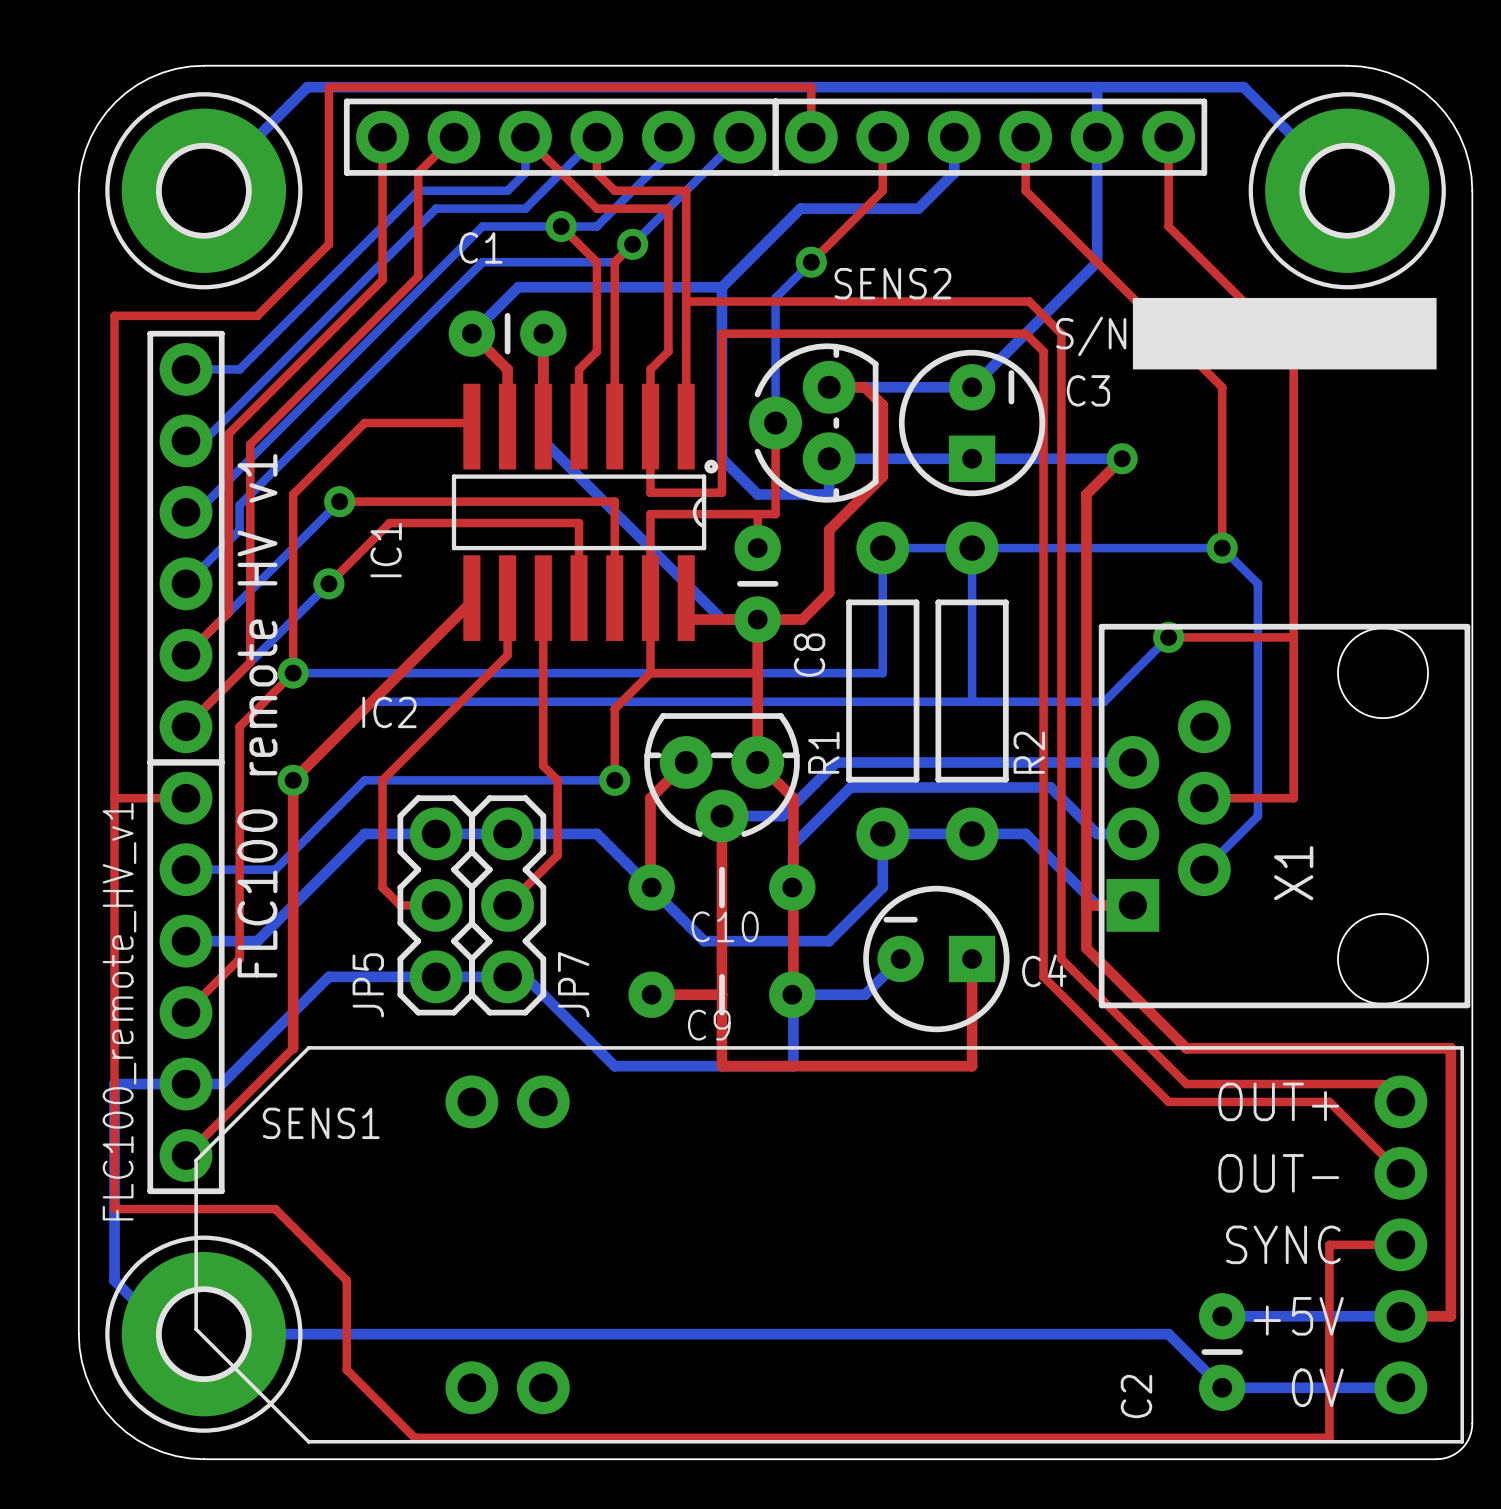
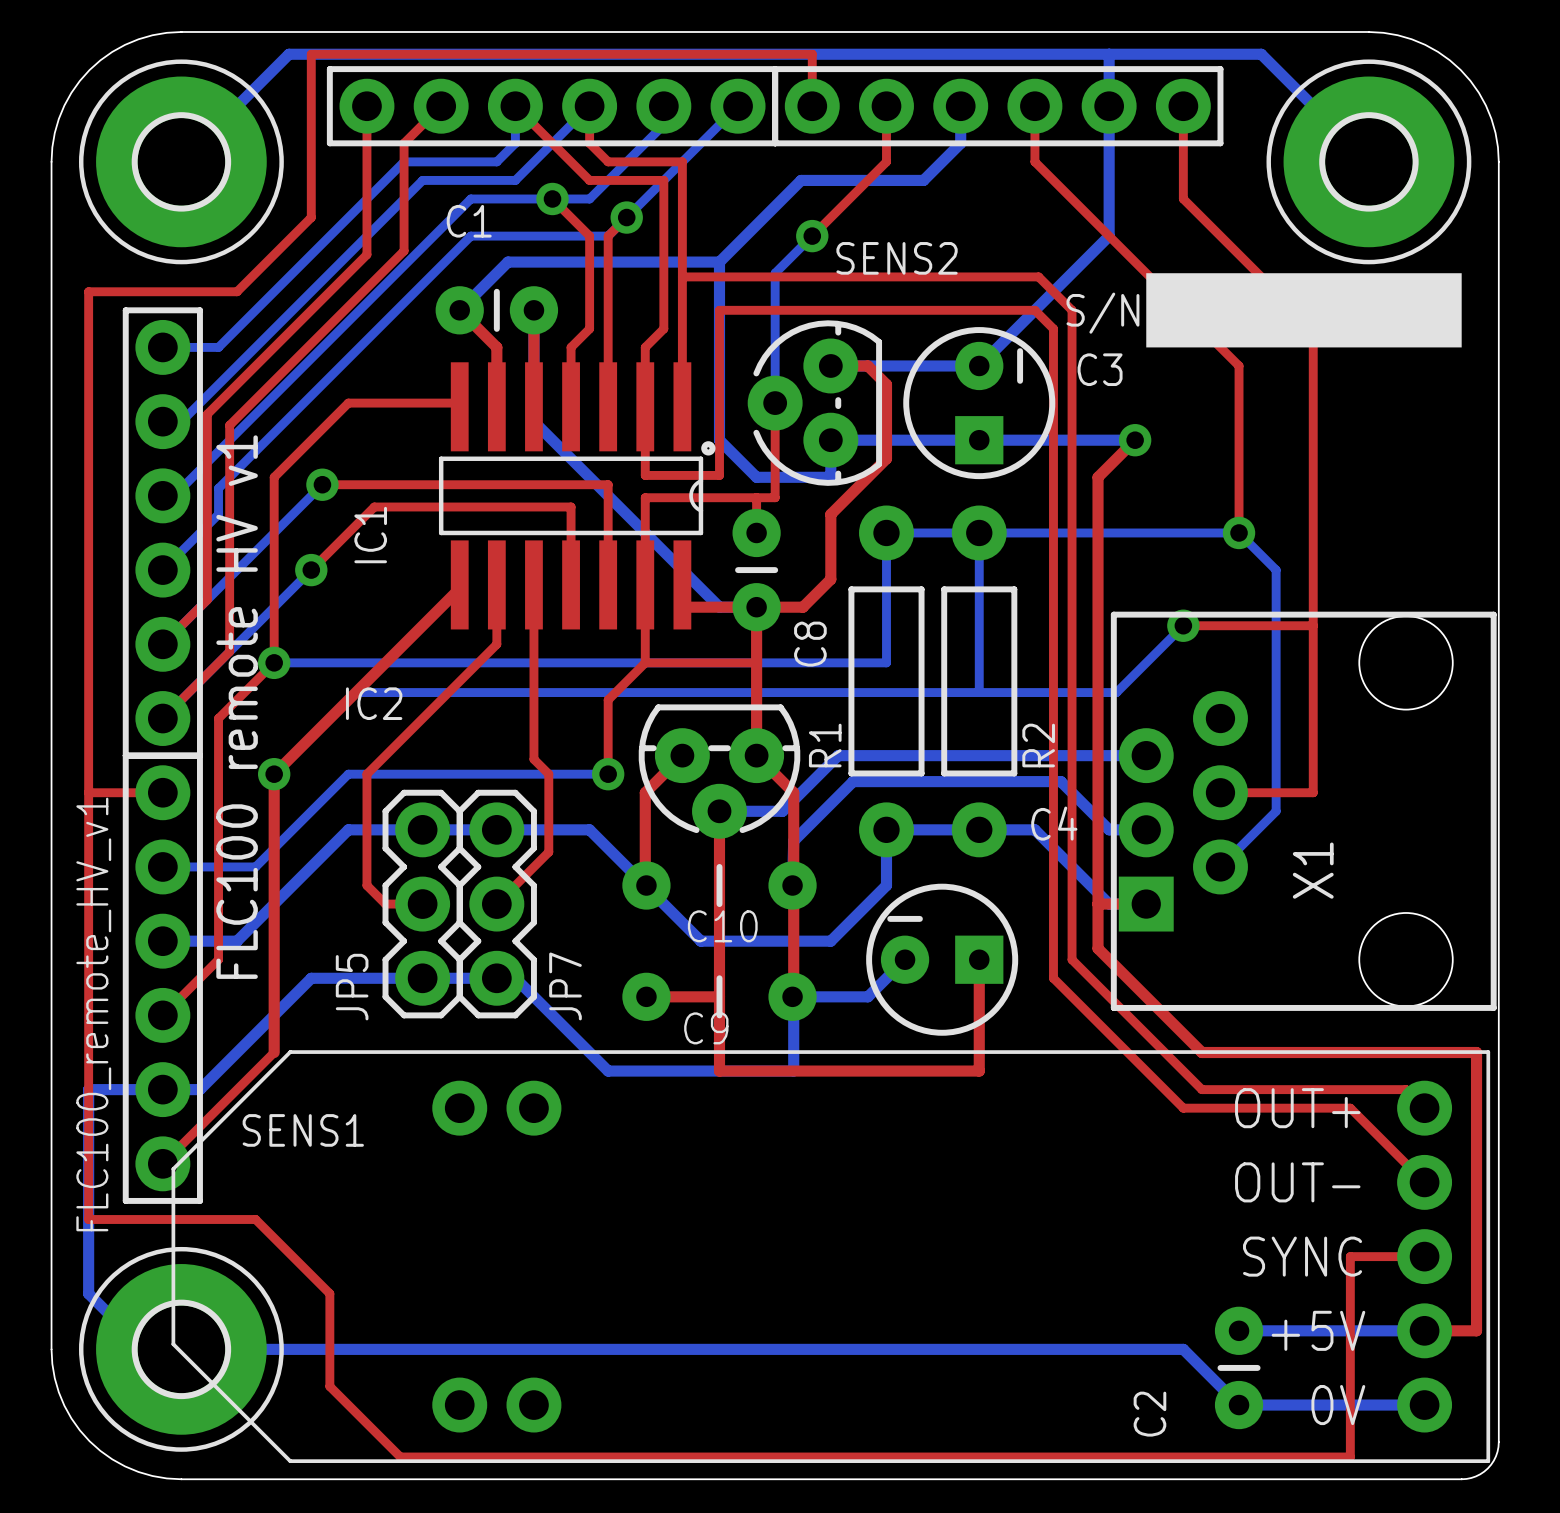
C4 name position: C4 (1044, 970) -> C4 (1054, 823)

